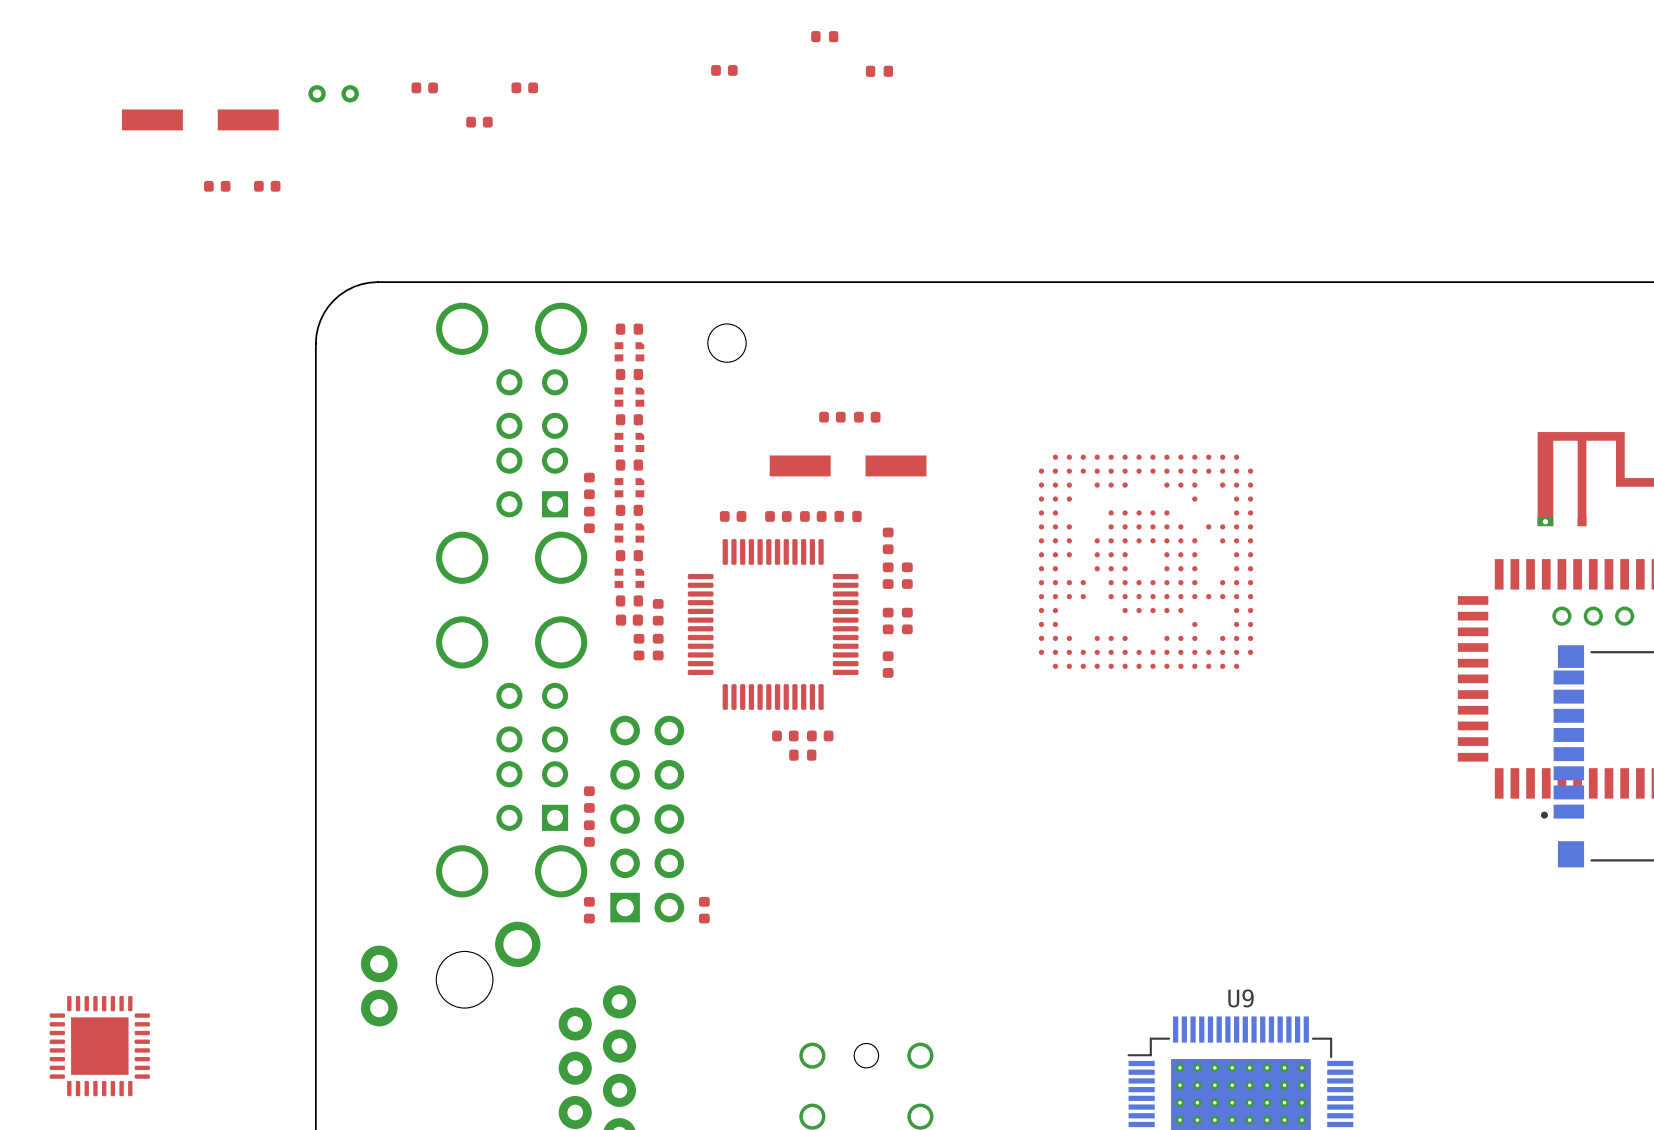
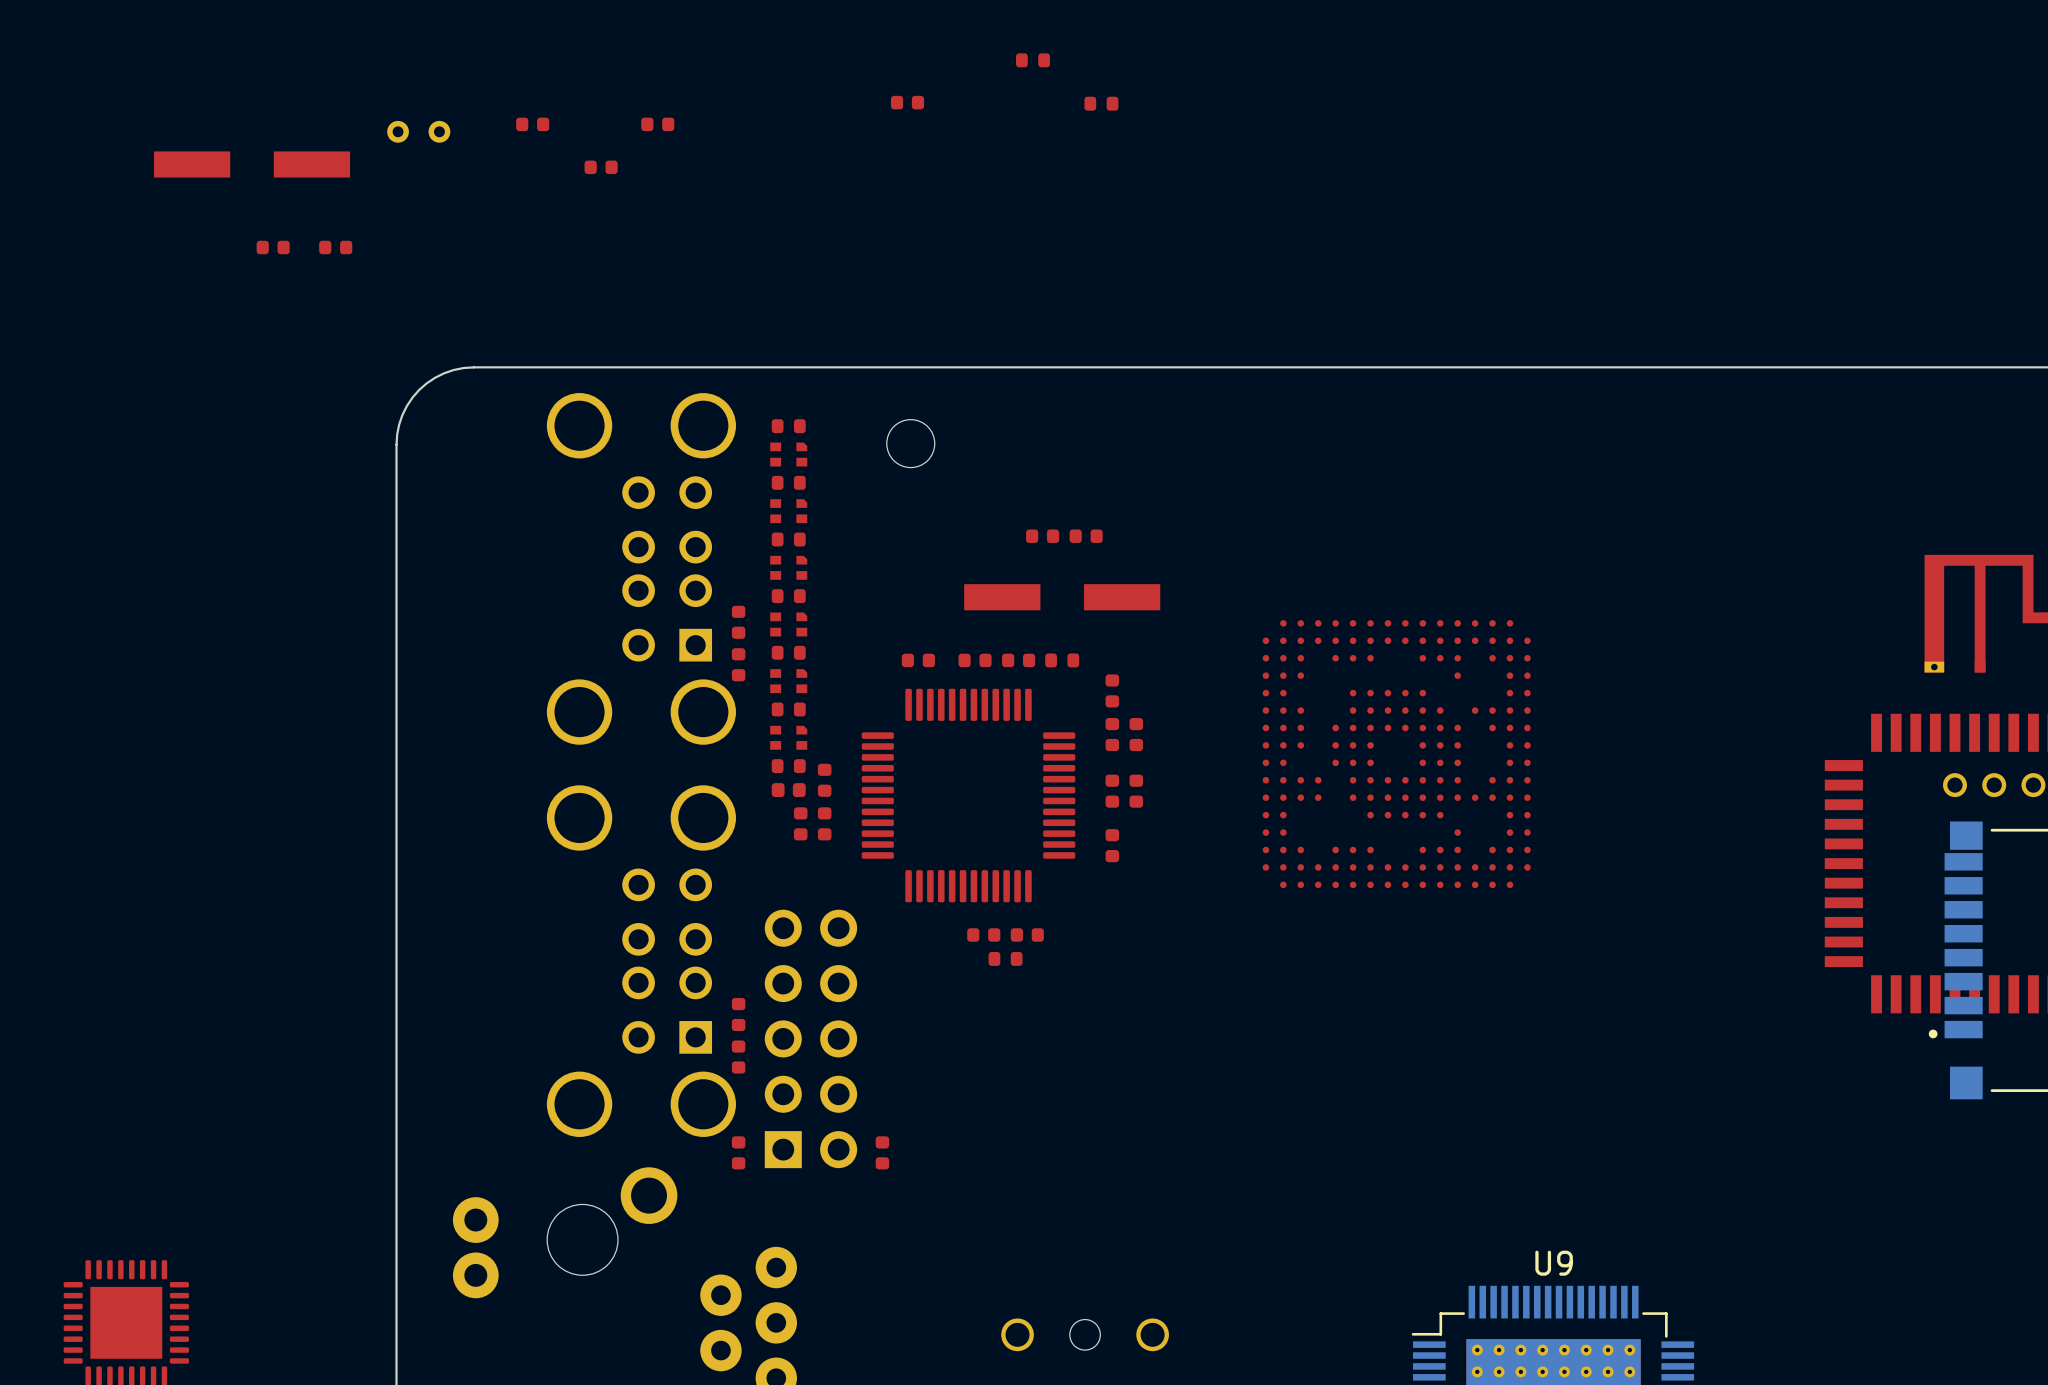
part position: (1146, 561) -> (1396, 754)

